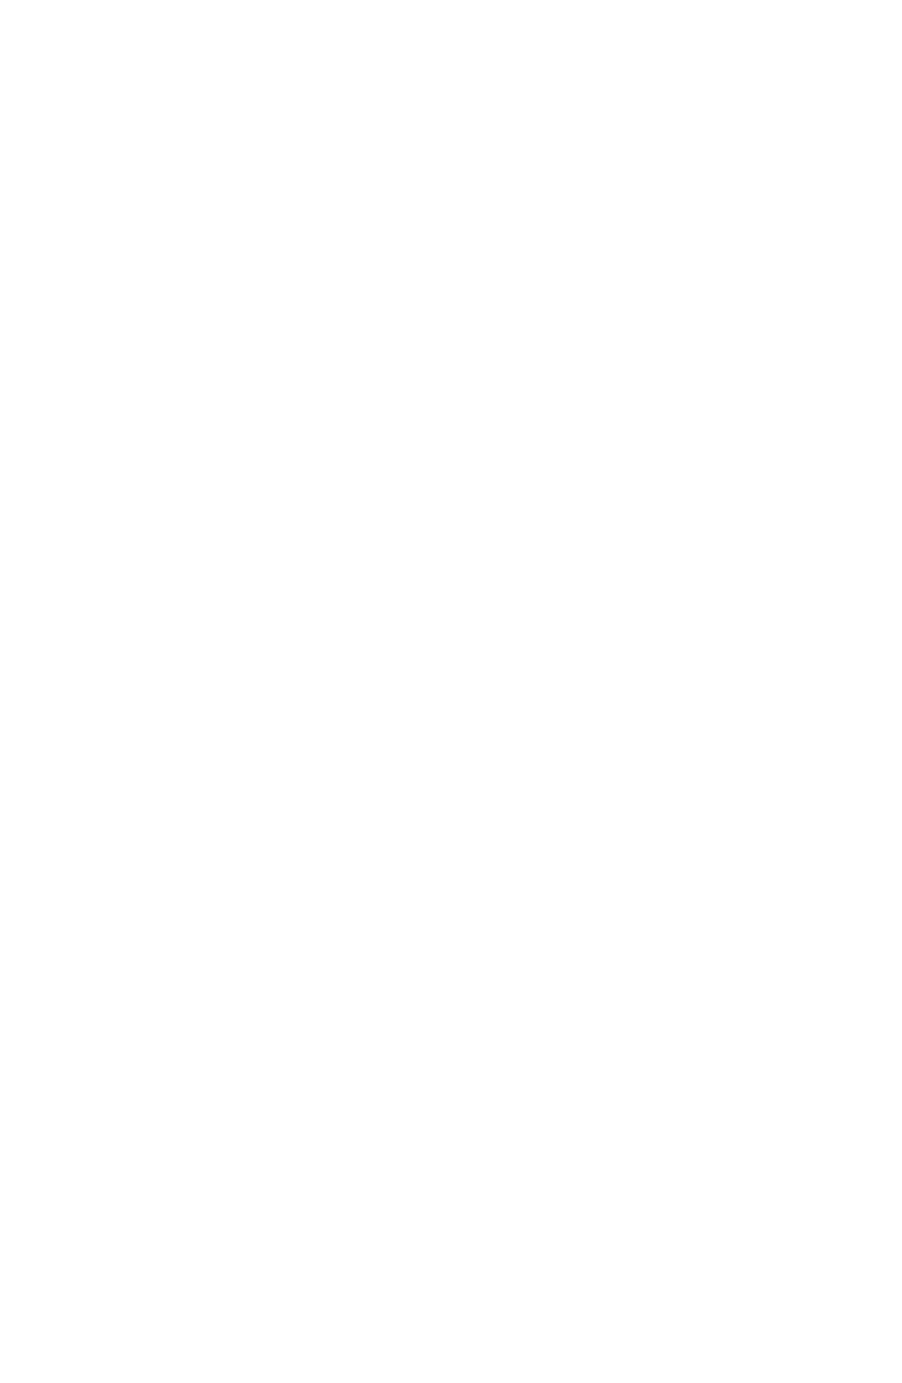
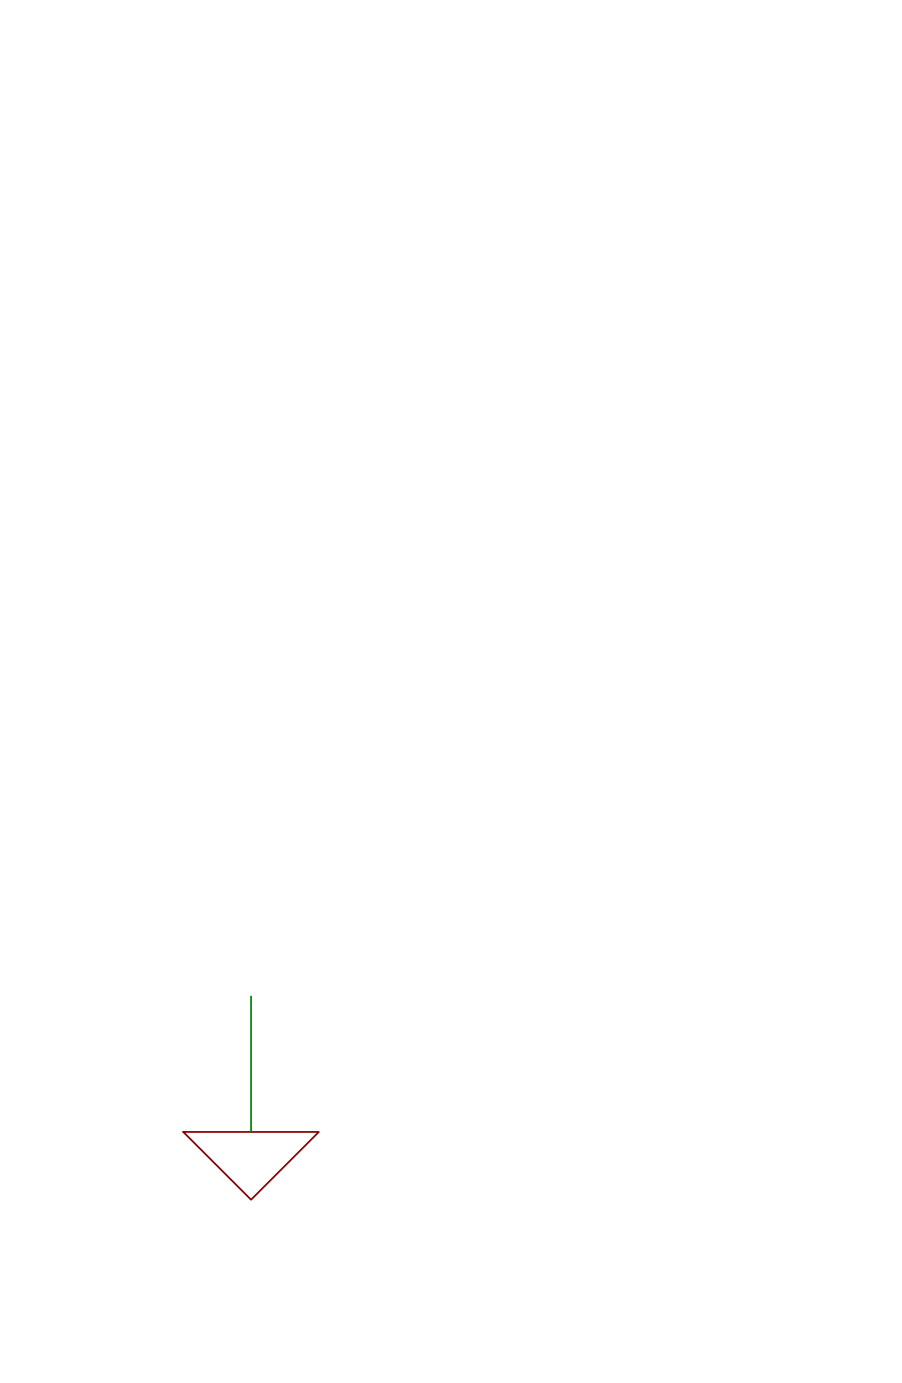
wire: none -> (251, 996) (251, 1131)
power symbol: none -> (251, 1165)

